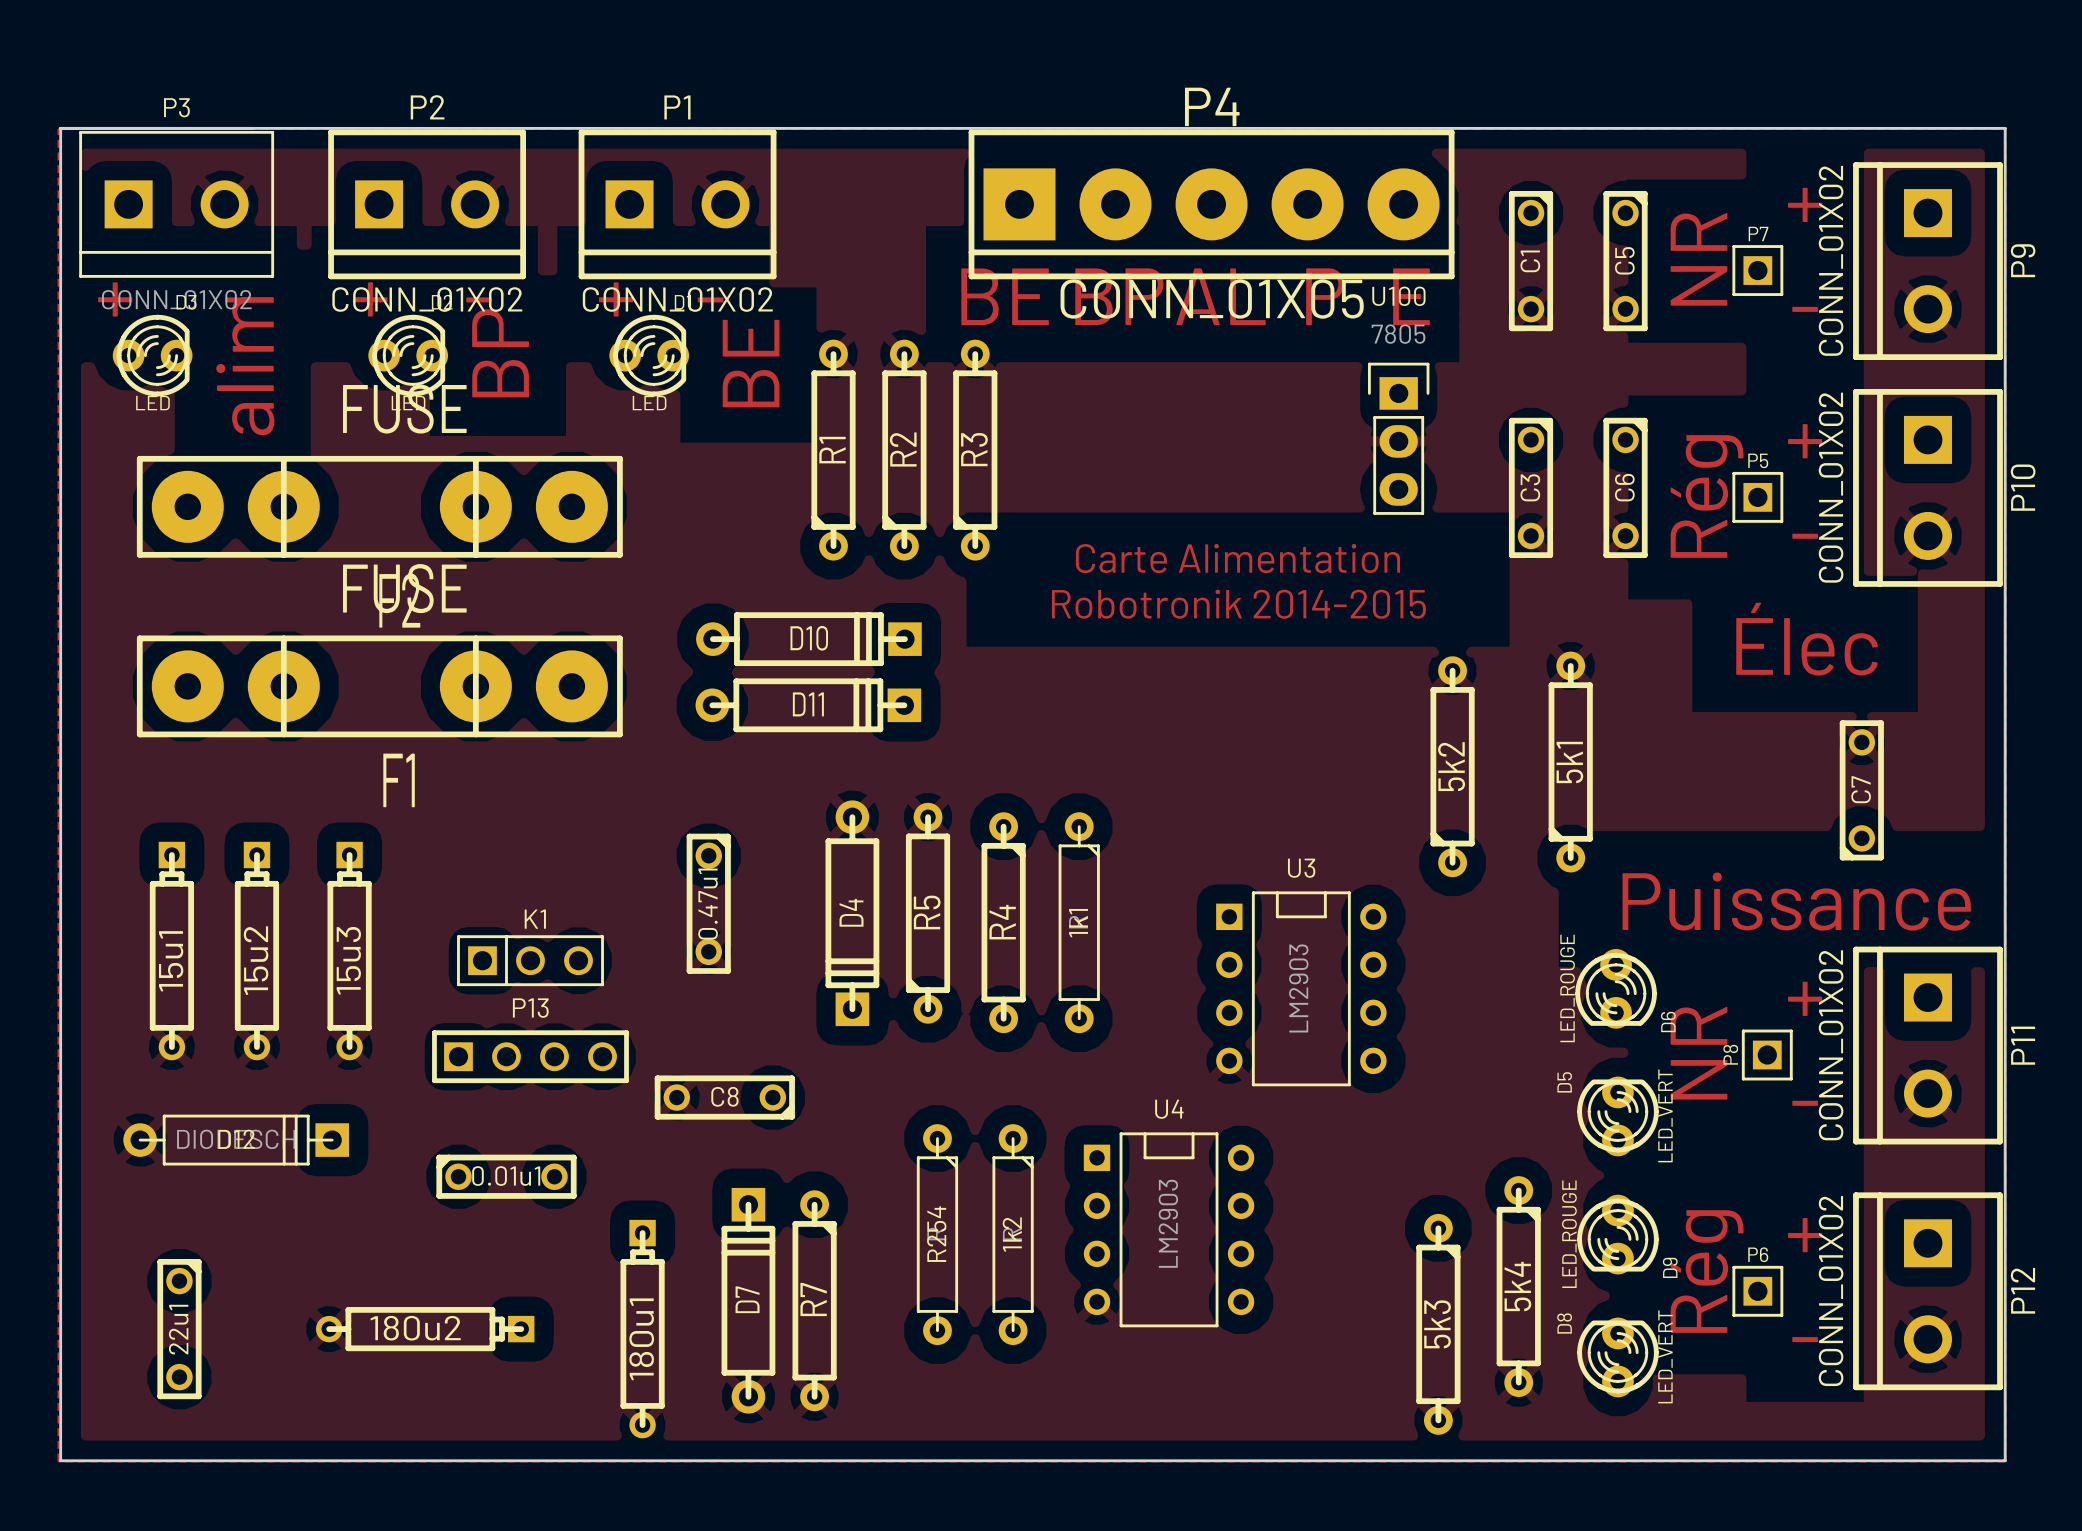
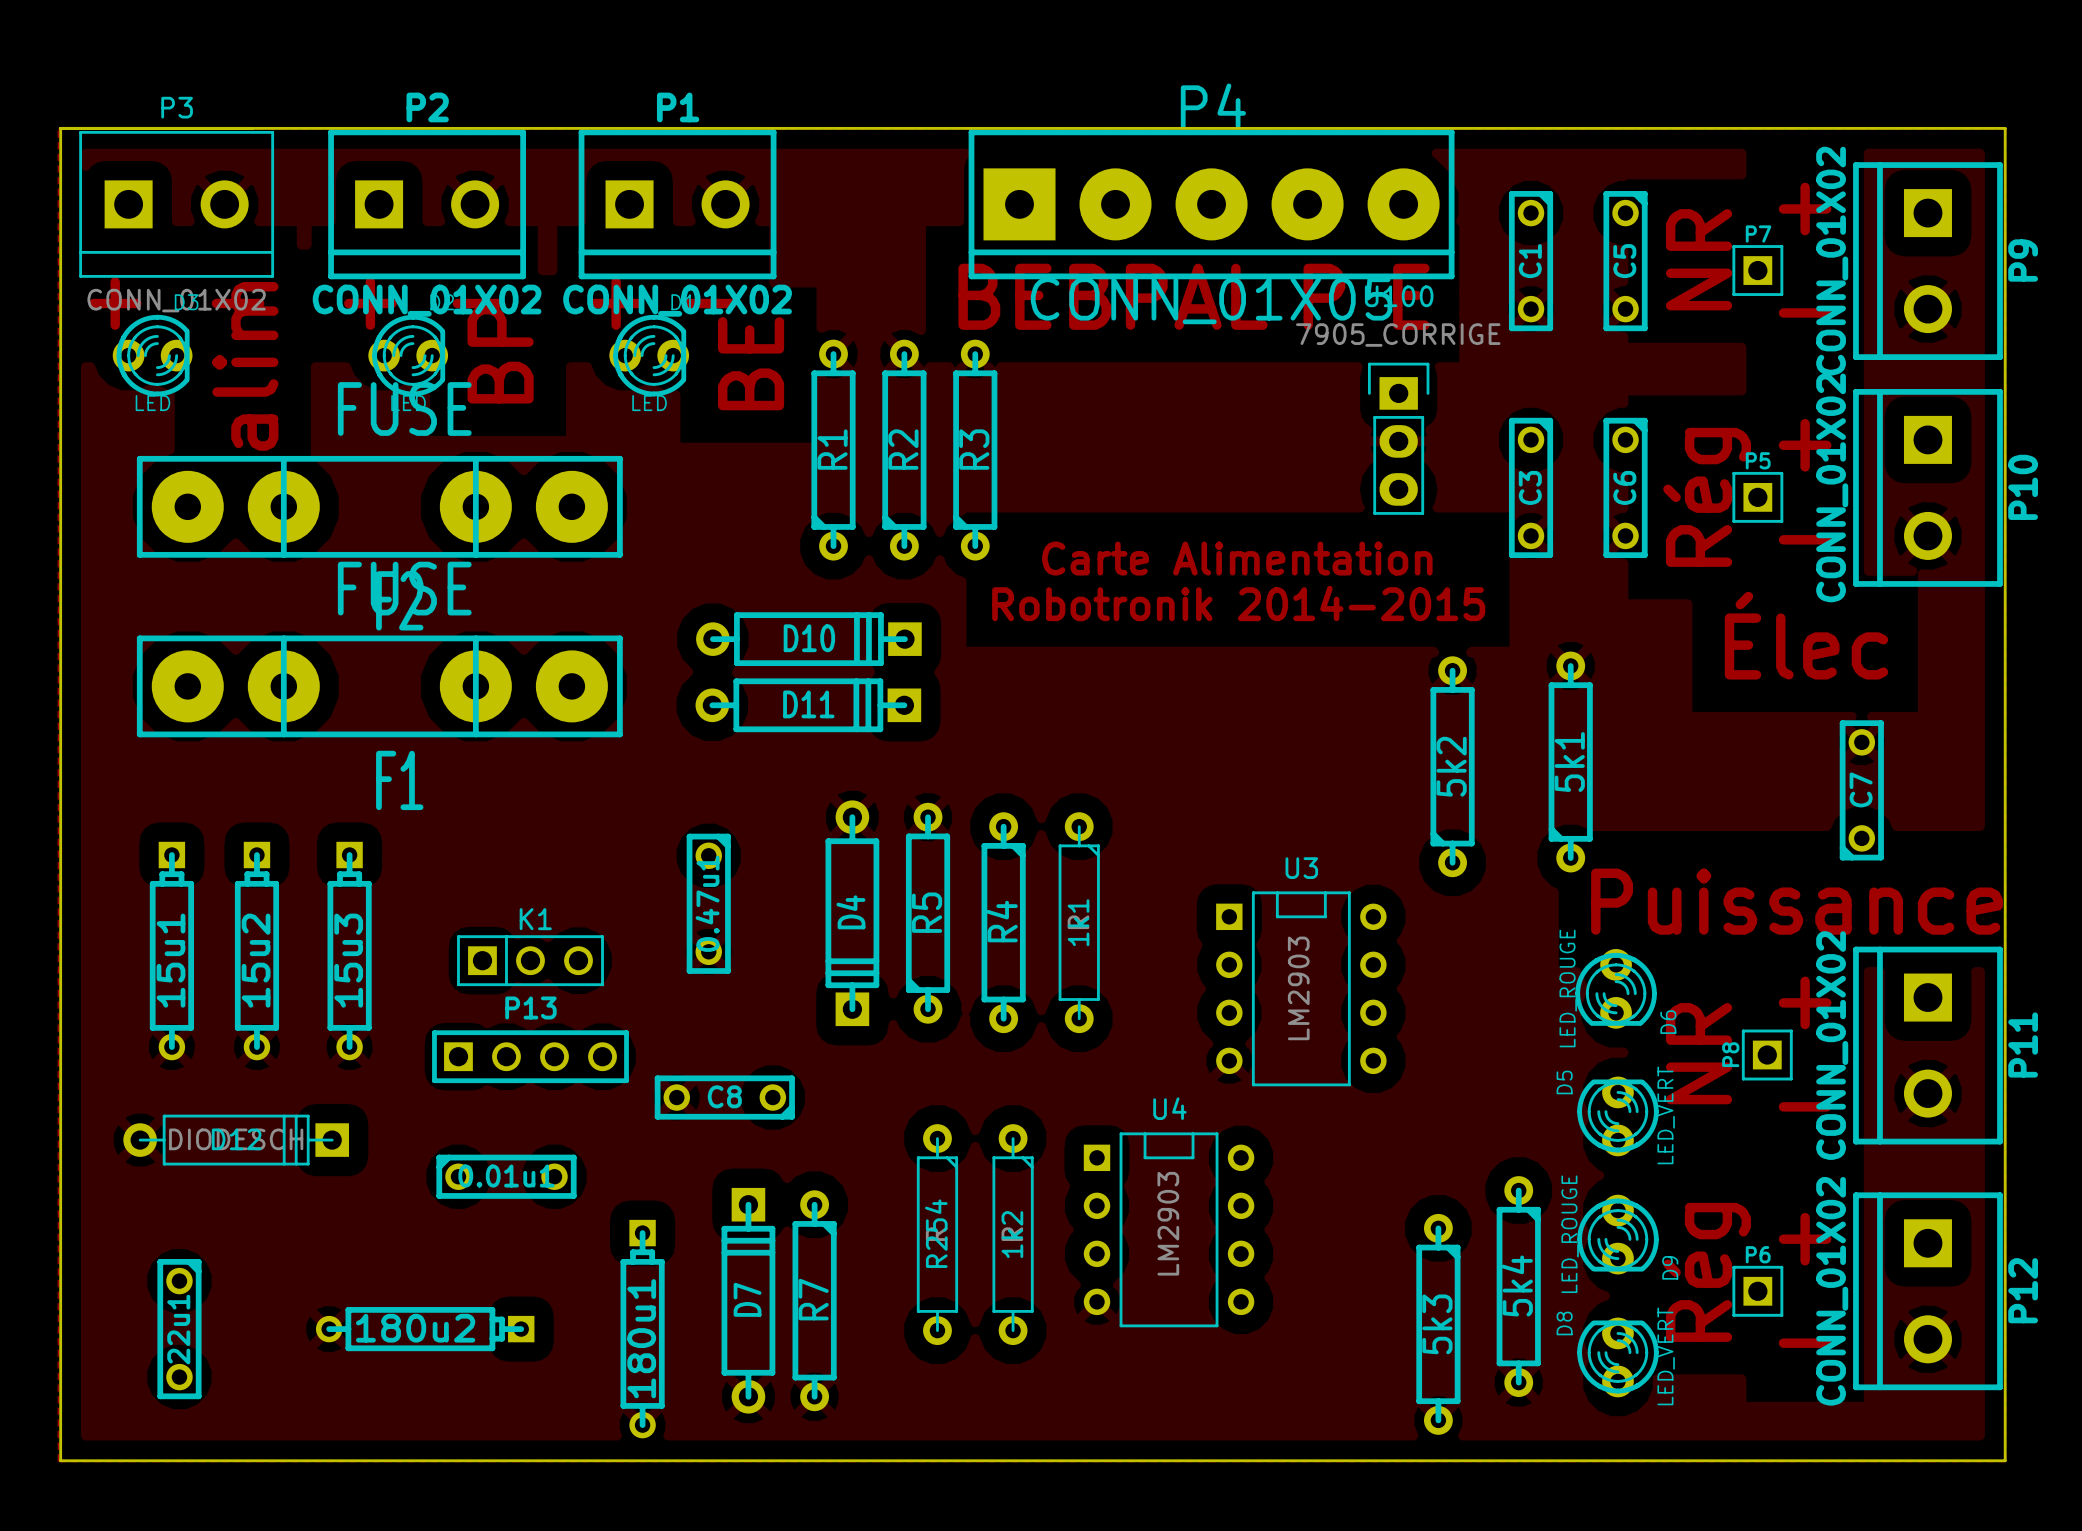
U100 value: 7805 (1398, 334) -> 7905_CORRIGE (1398, 335)

